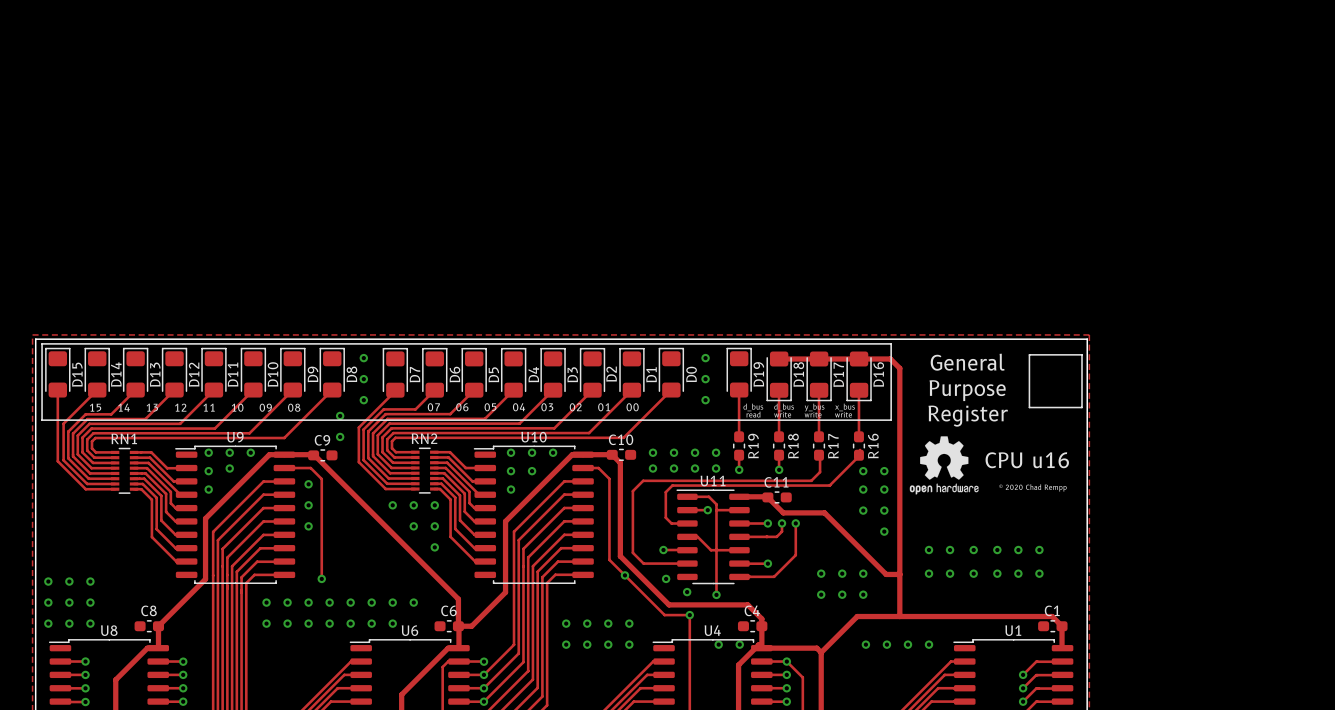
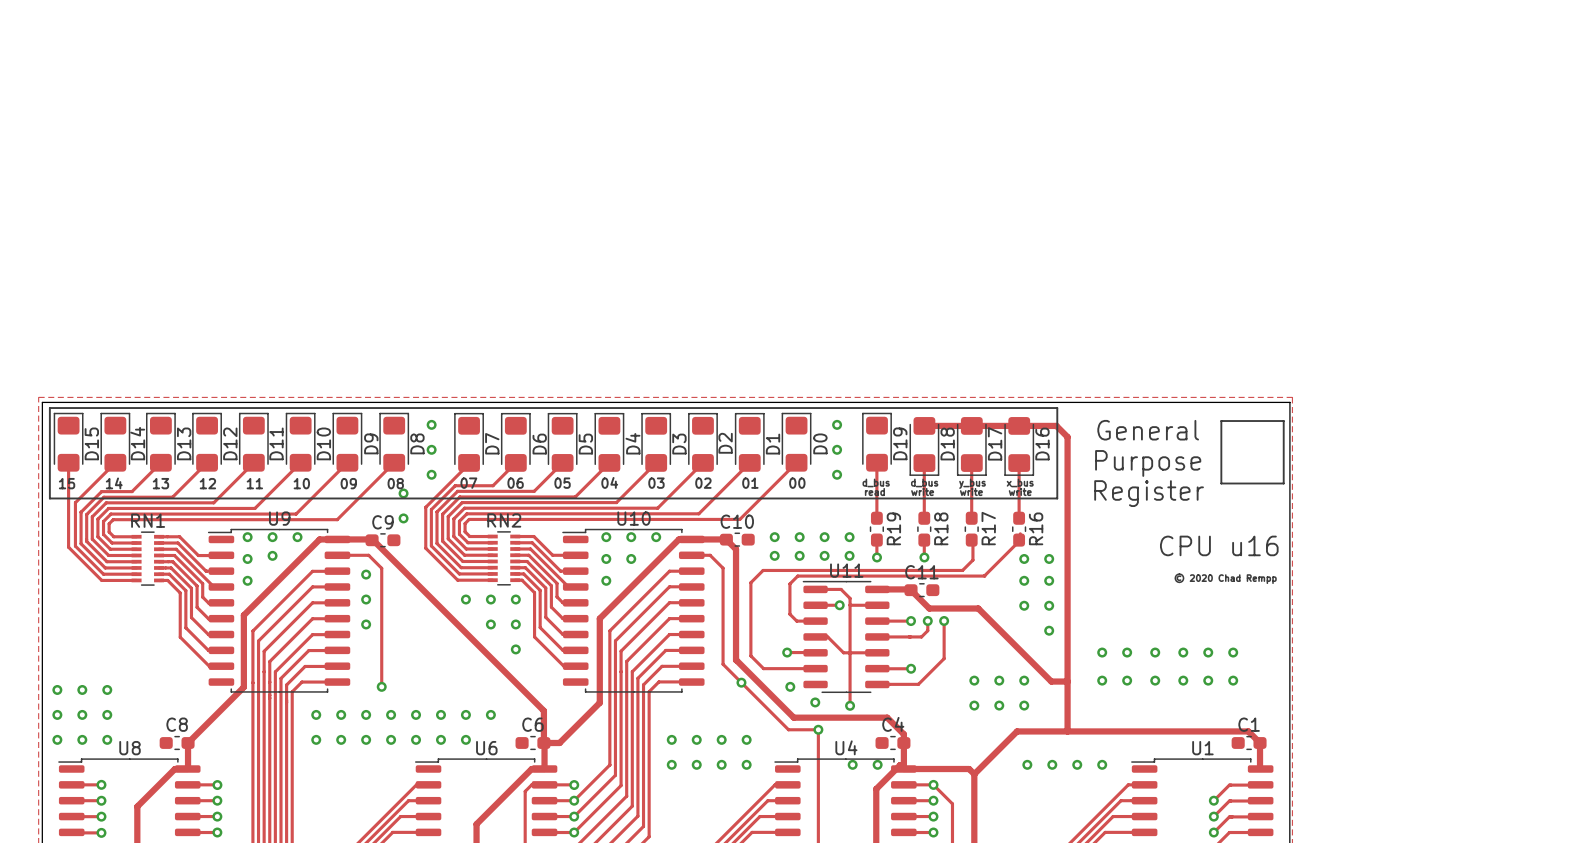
drawing: [909, 436, 979, 495] -> none

